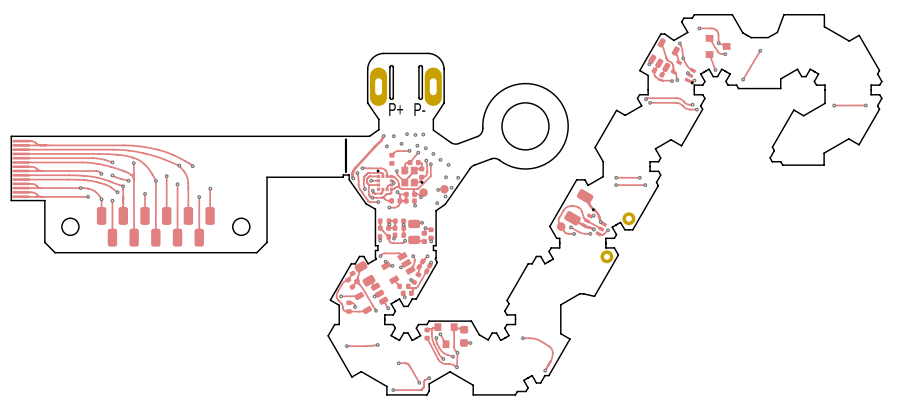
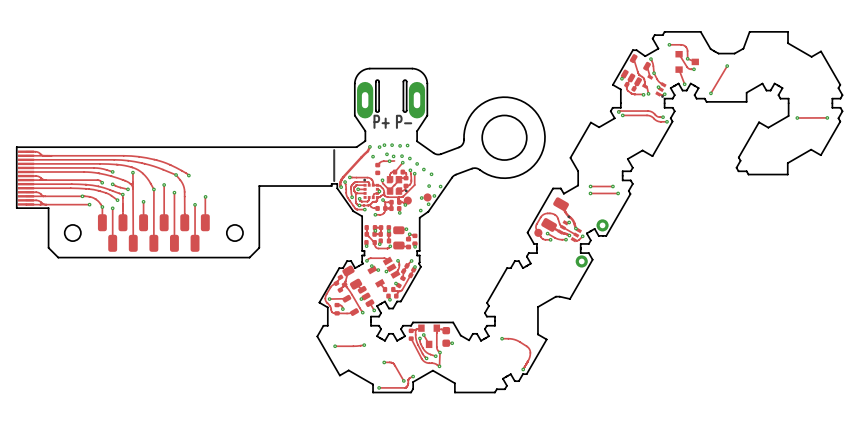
via: none -> (384, 145)
via: none -> (393, 156)
via: (409, 150) -> none
via: none -> (389, 161)

